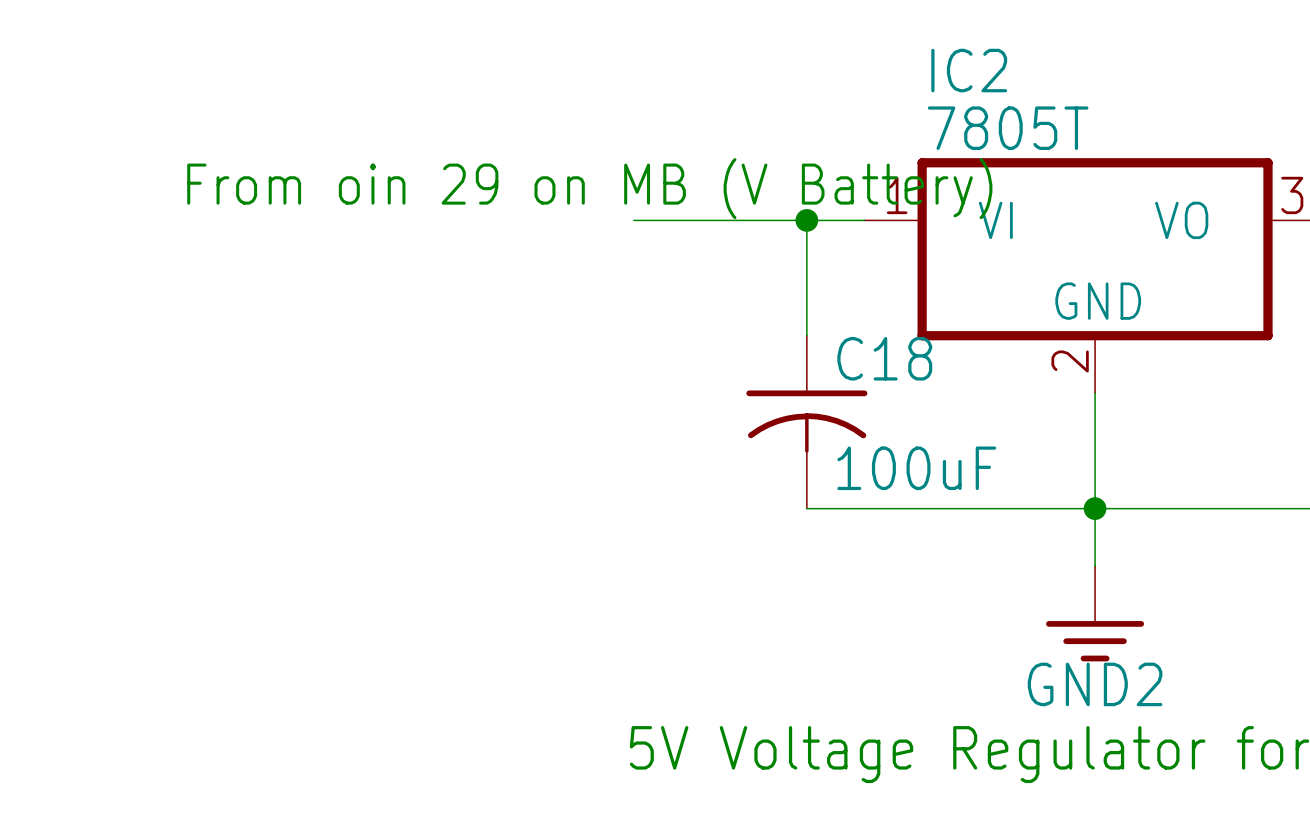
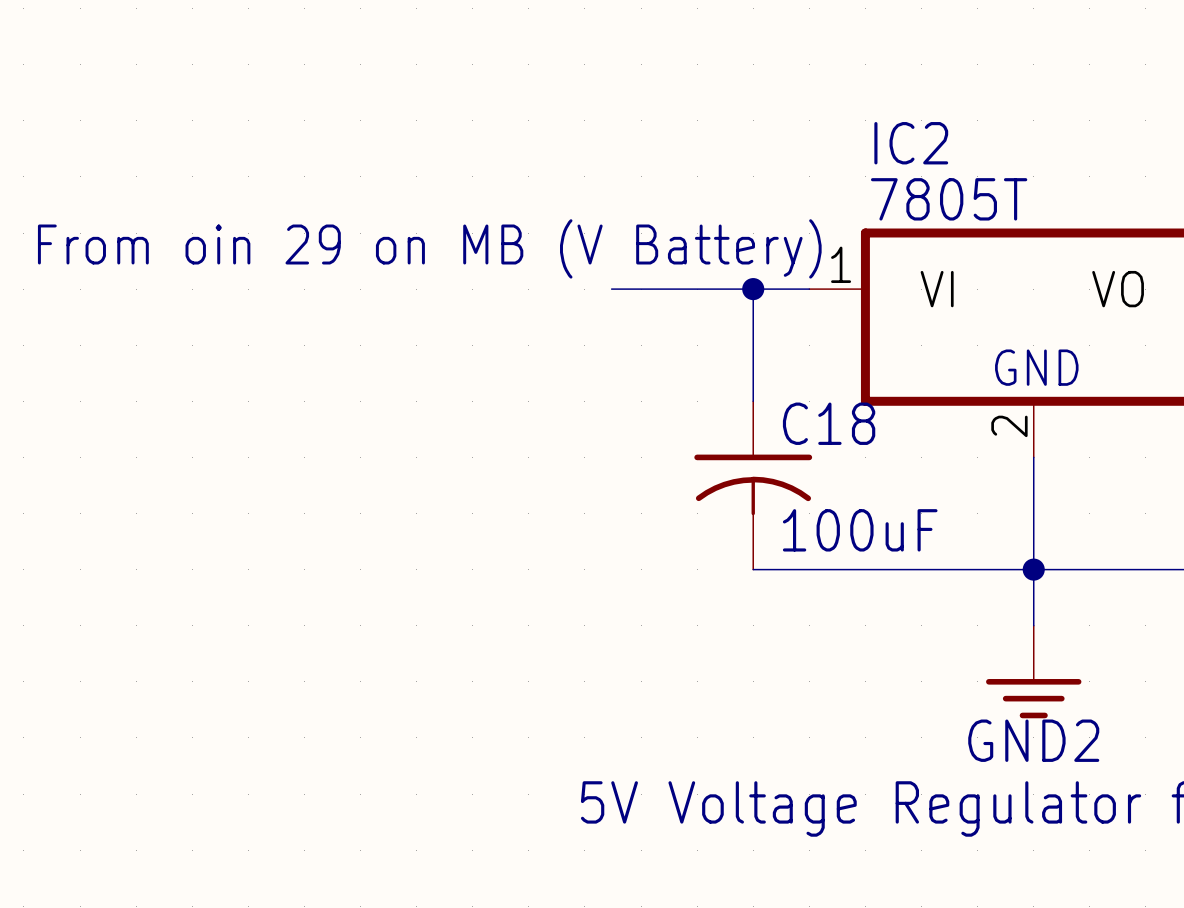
text position: From oin 29 on MB (V Battery) (589, 188) -> From oin 29 on MB (V Battery) (429, 248)
wire: (633, 220) (661, 220) -> none

